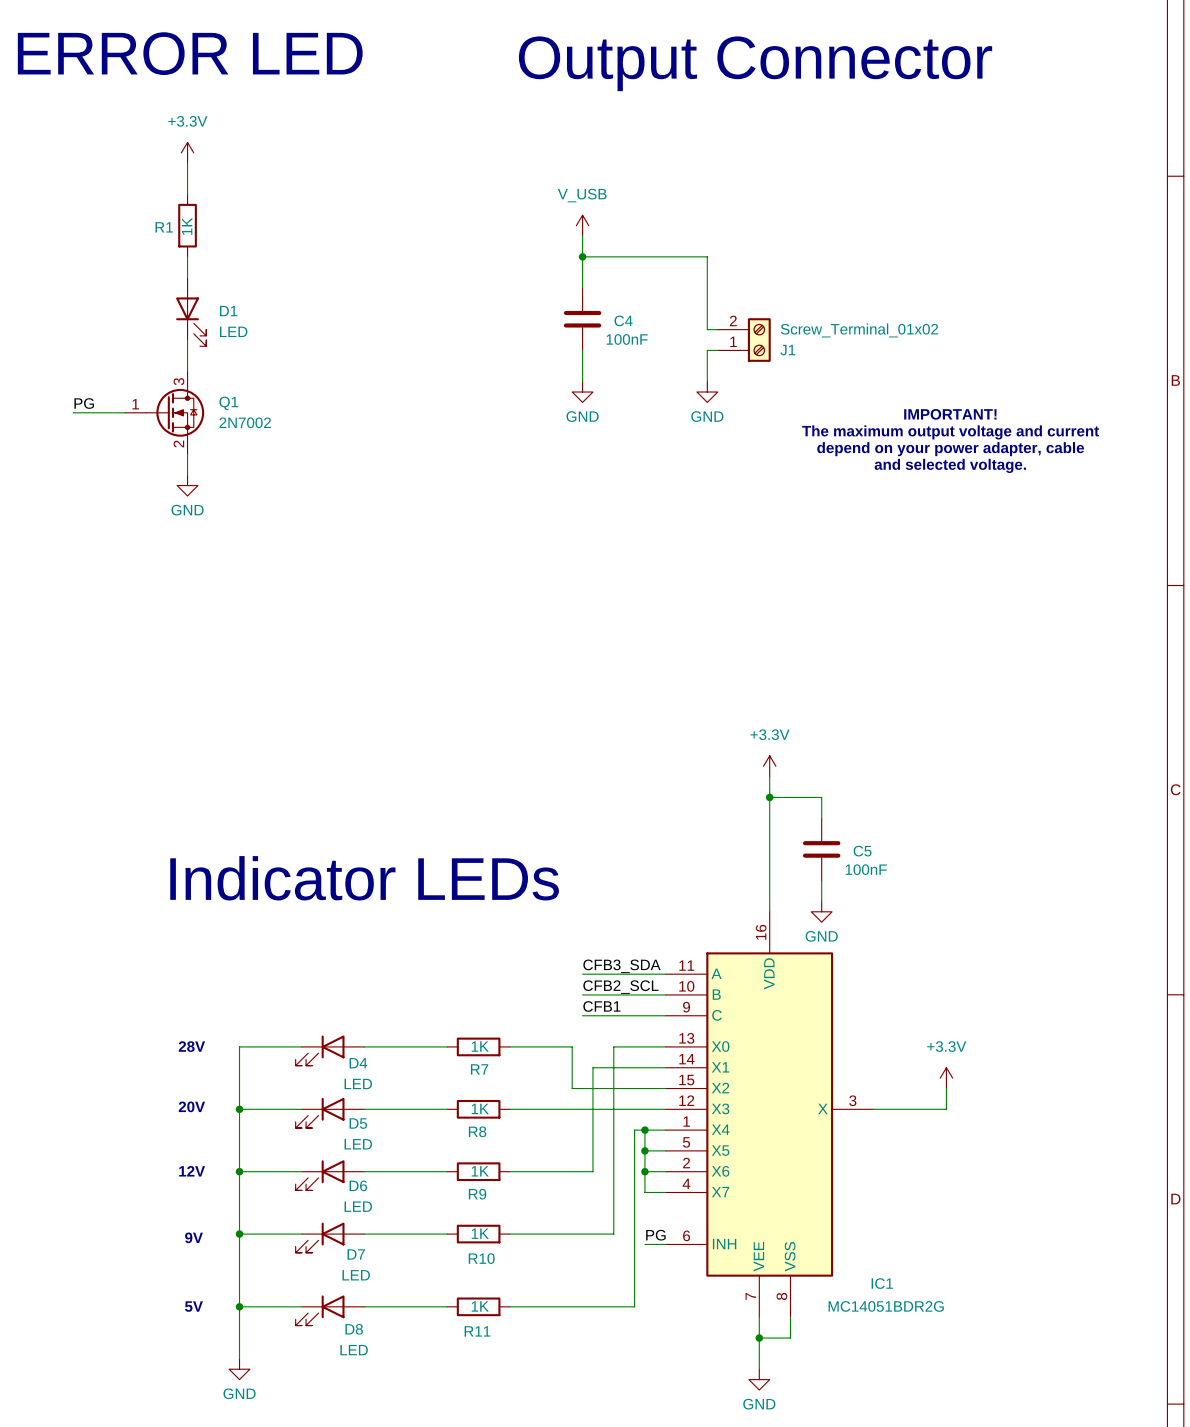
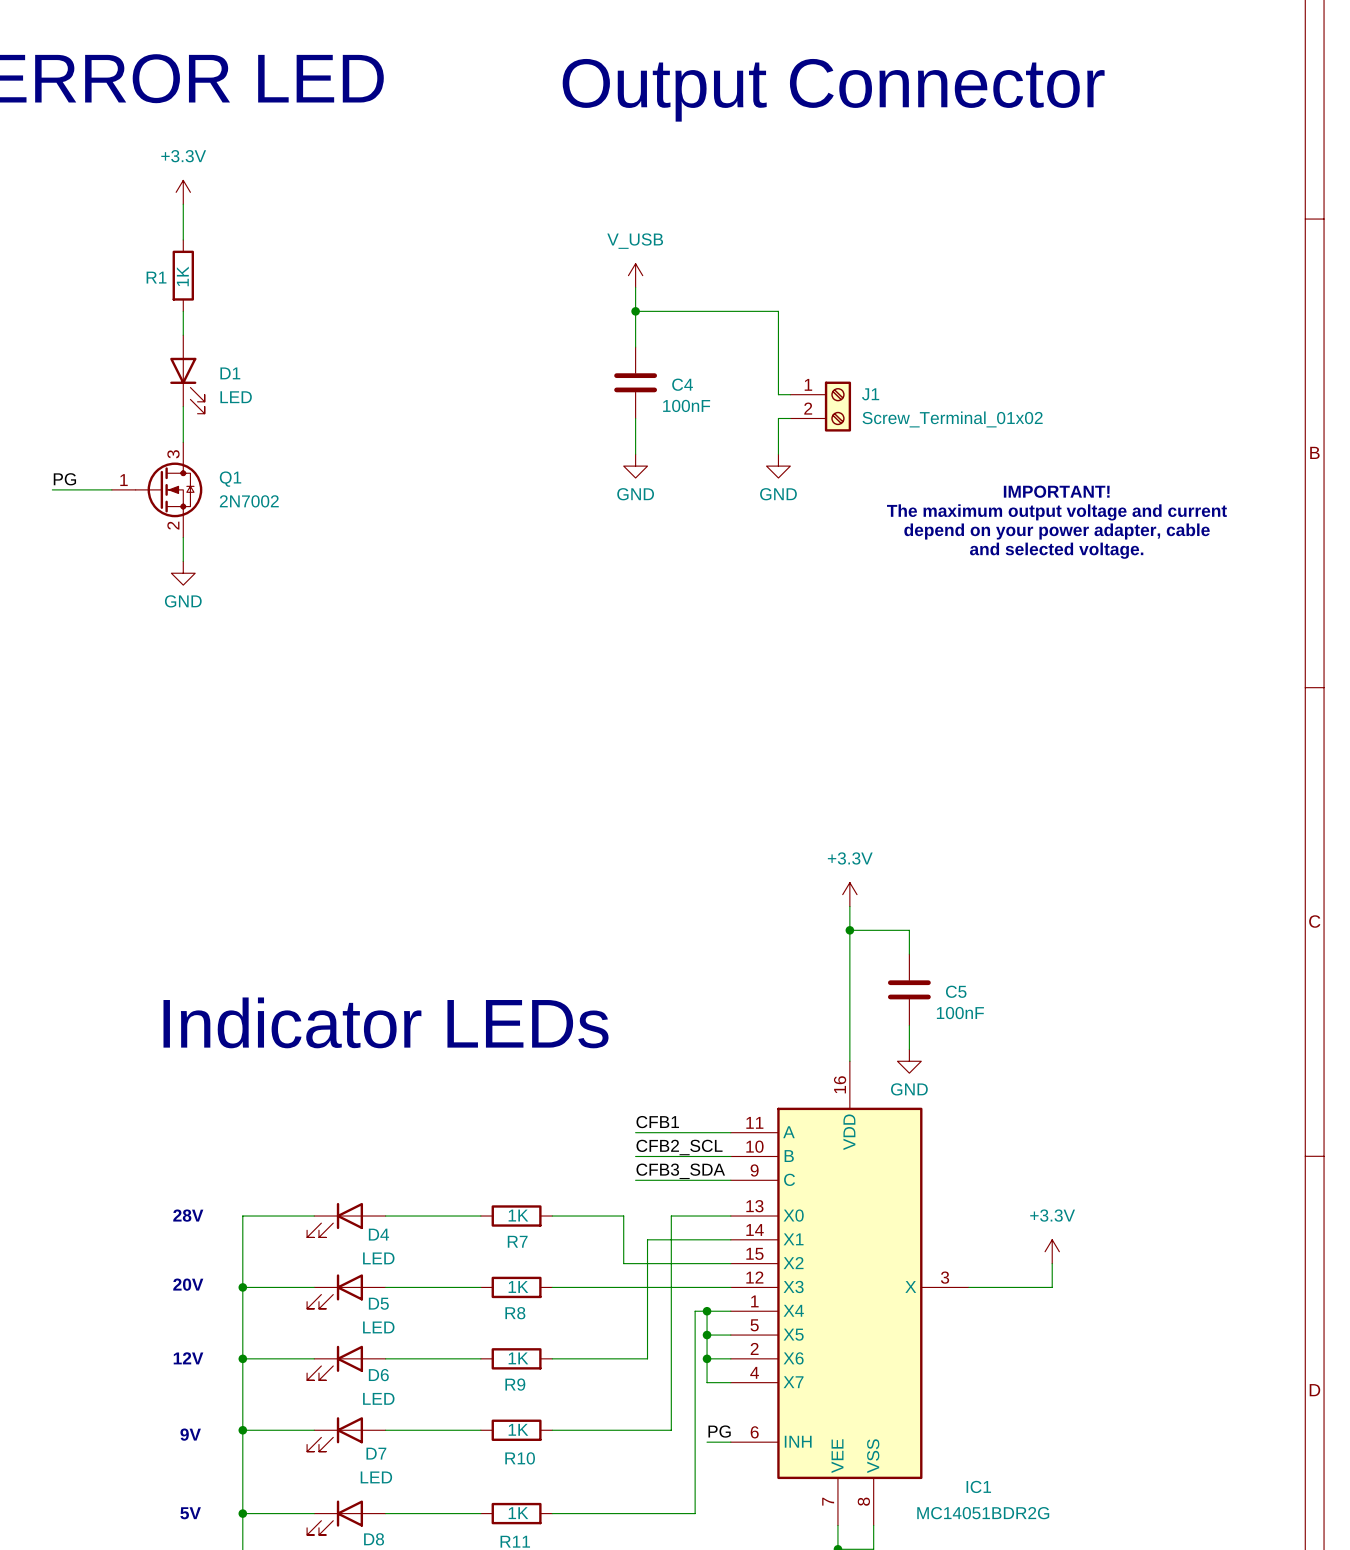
J1 flip: as is (759, 340) -> up-down (837, 406)
label: CFB3_SDA (622, 966) -> CFB1 (657, 1122)
label: CFB1 (601, 1006) -> CFB3_SDA (680, 1171)

